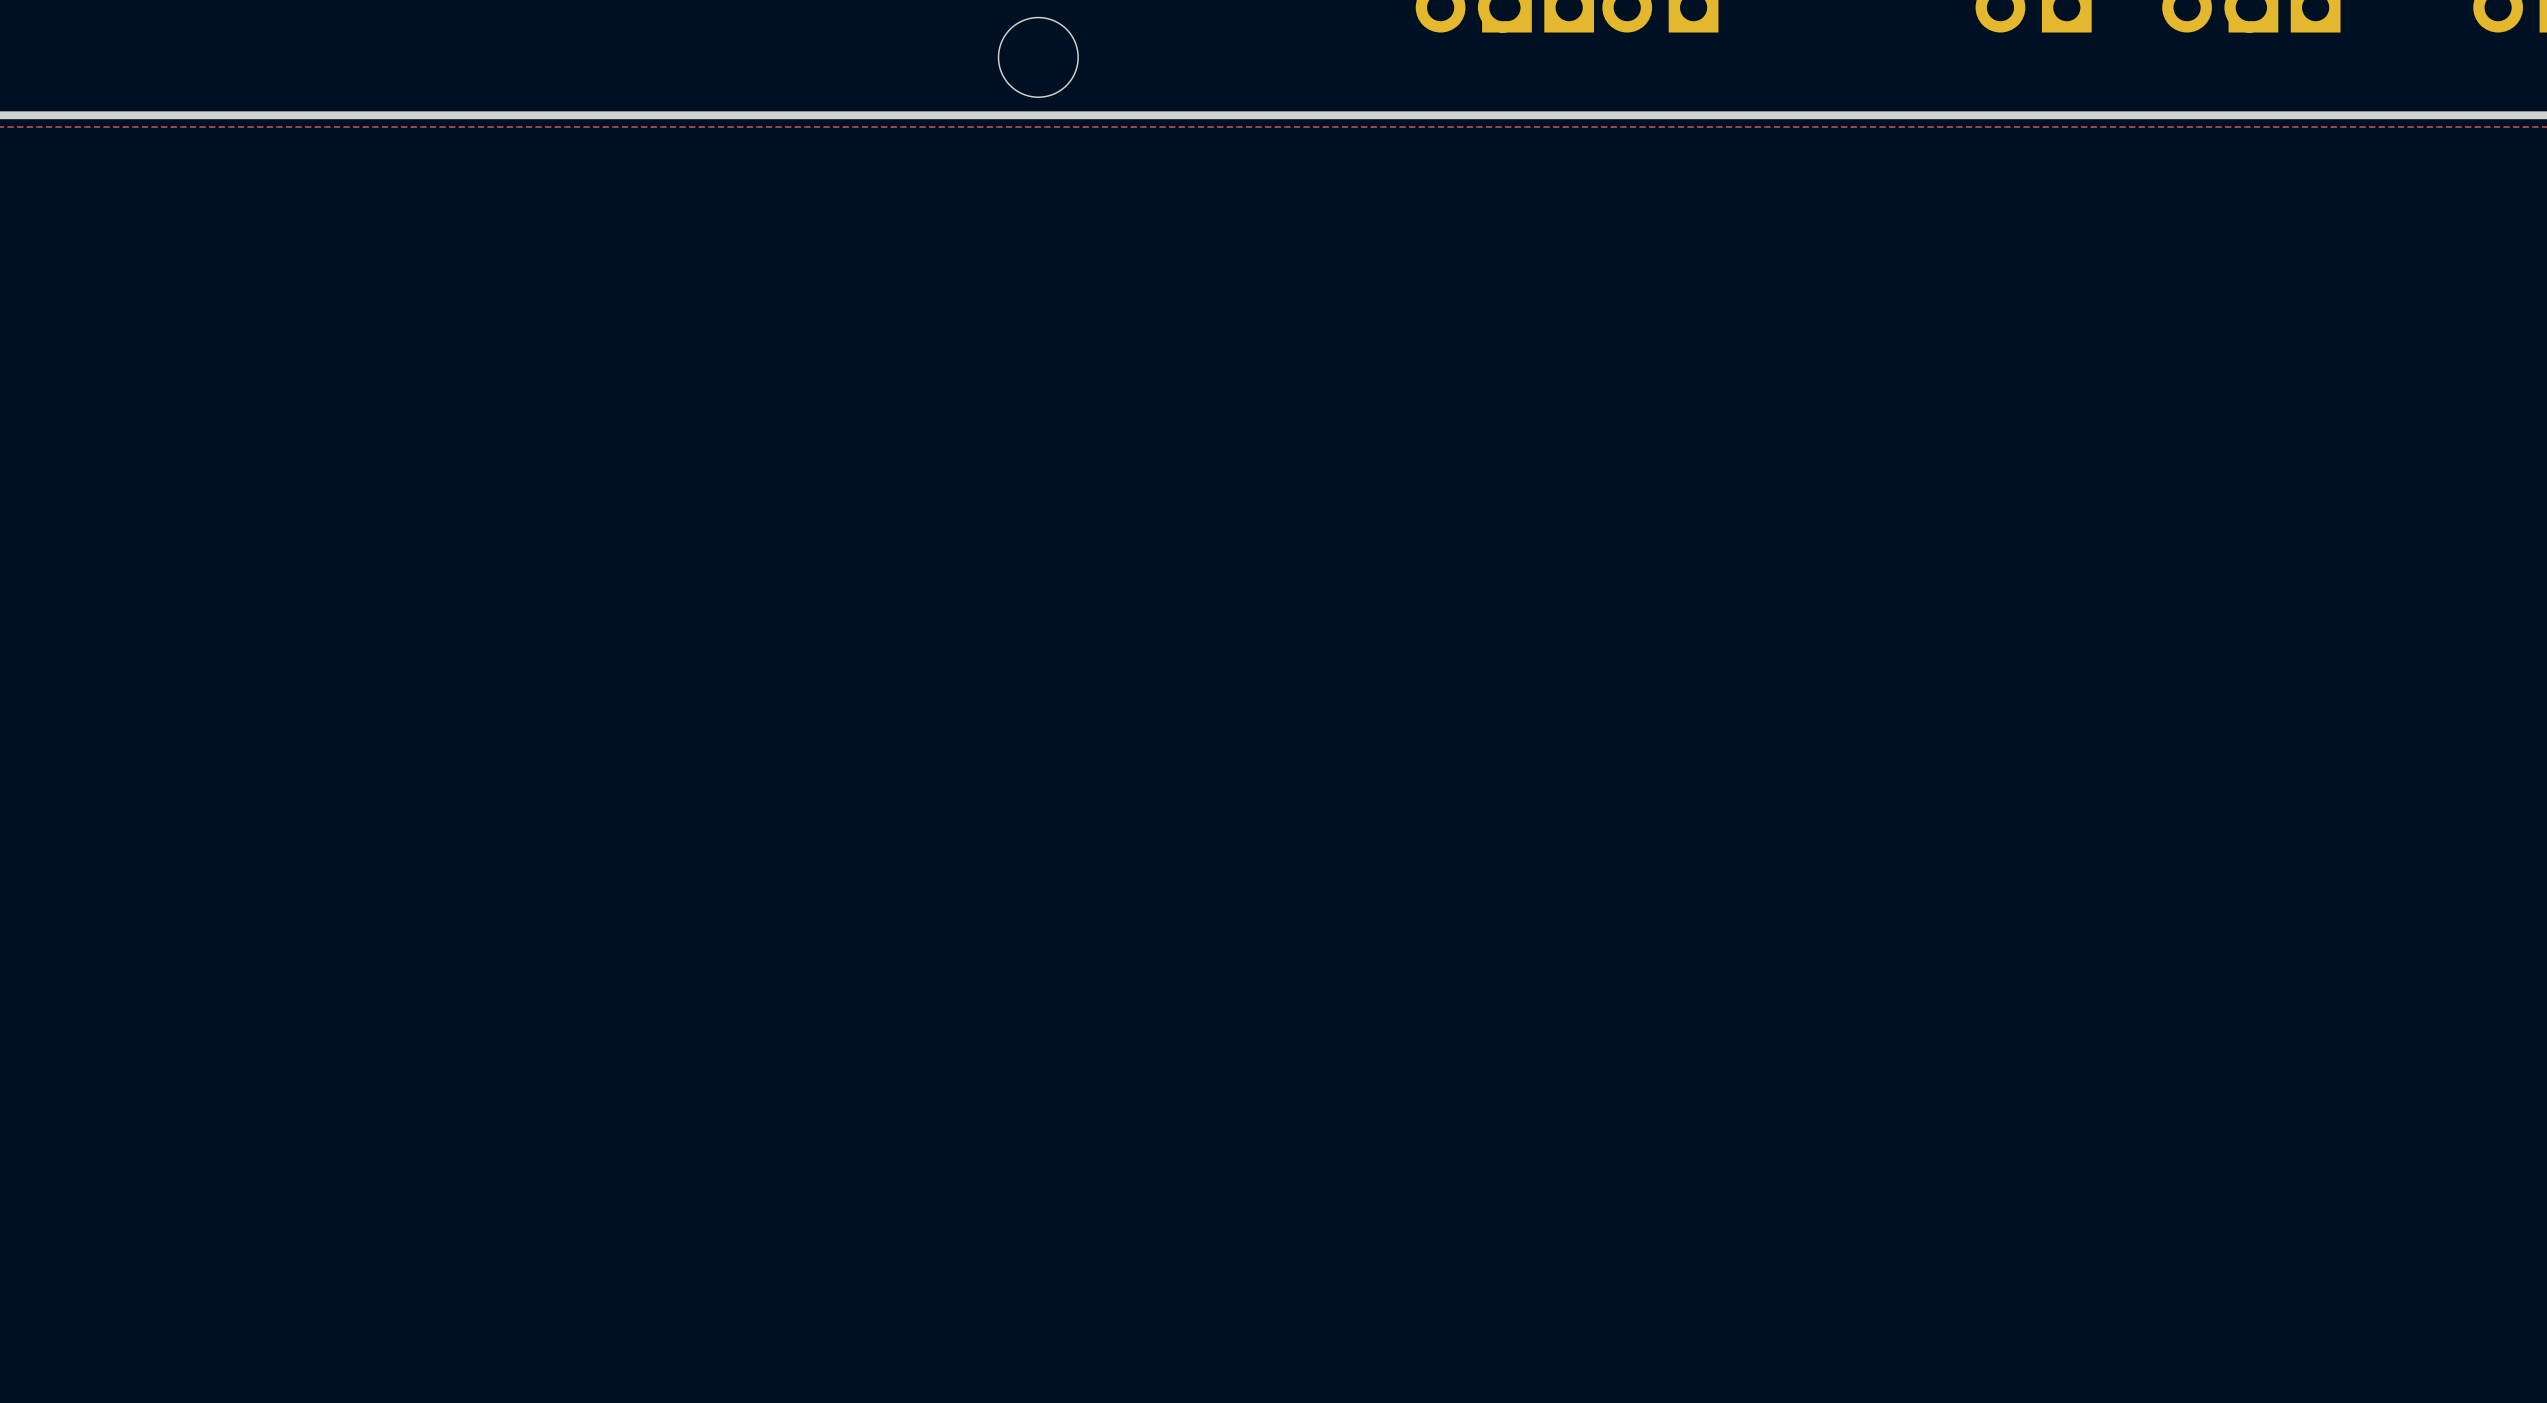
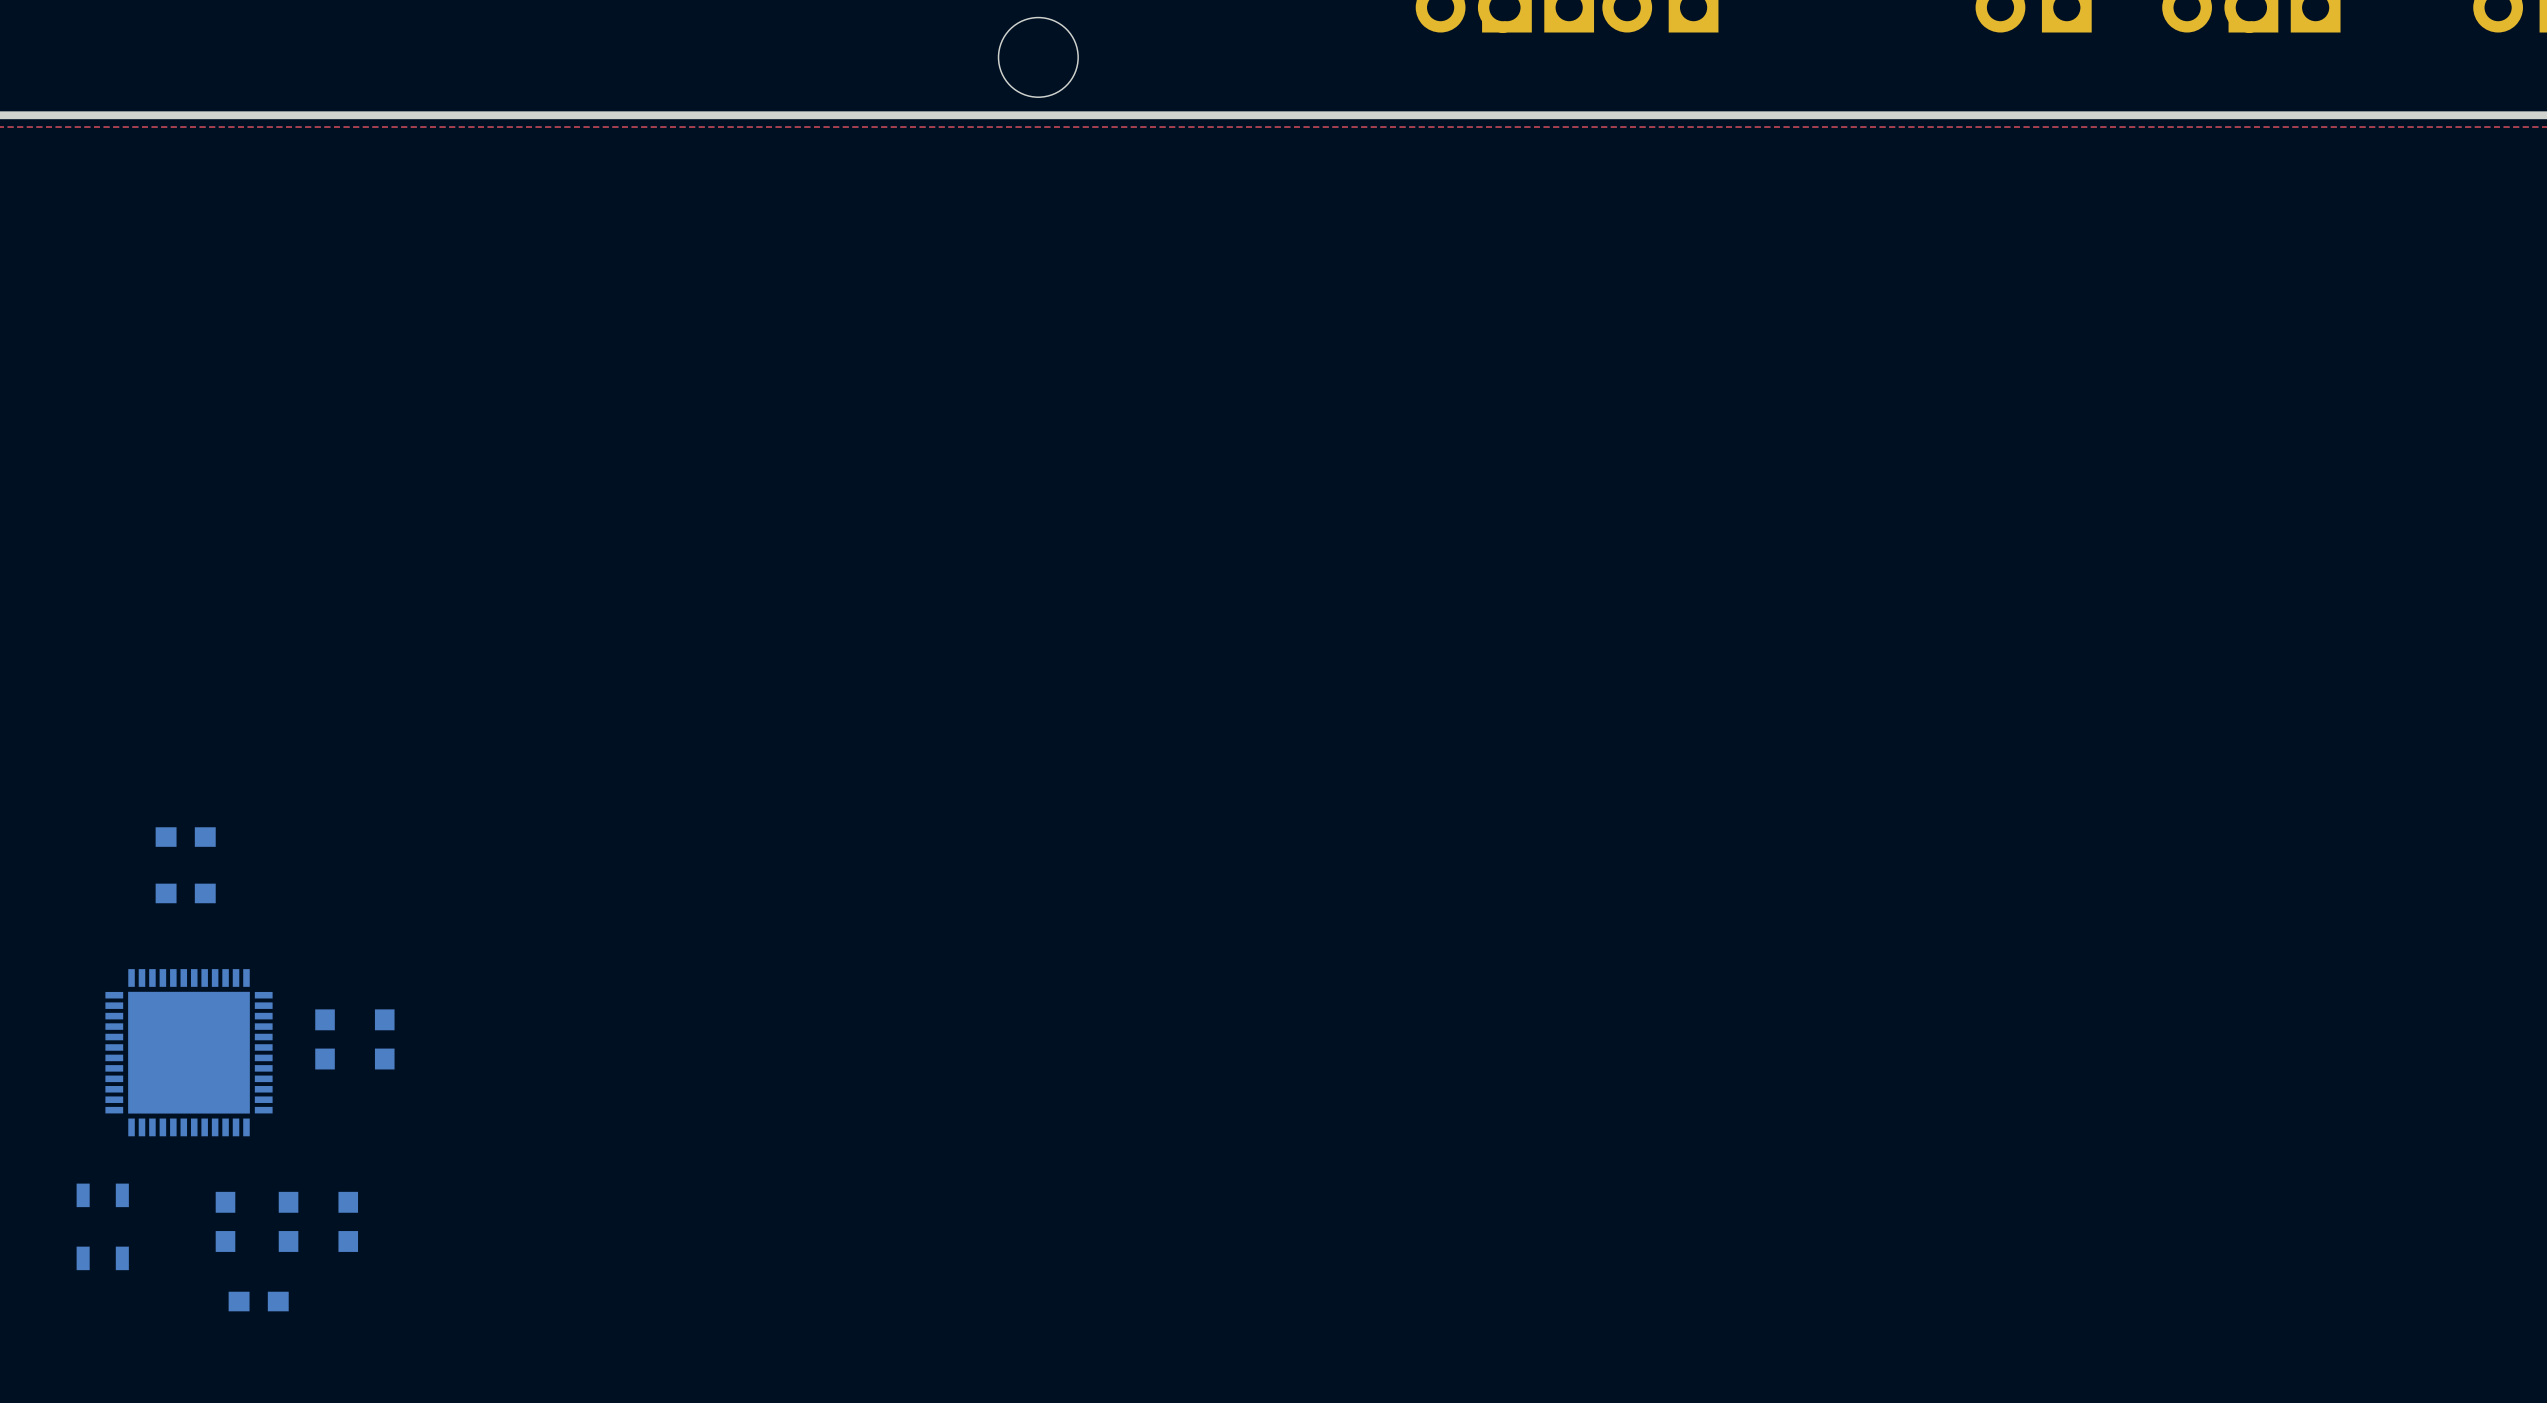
part: none -> (185, 837)
part: none -> (185, 893)
part: none -> (325, 1039)
part: none -> (384, 1039)
part: none -> (189, 1052)
part: none -> (102, 1195)
part: none -> (225, 1221)
part: none -> (288, 1221)
part: none -> (348, 1221)
part: none -> (102, 1258)
part: none -> (258, 1301)

